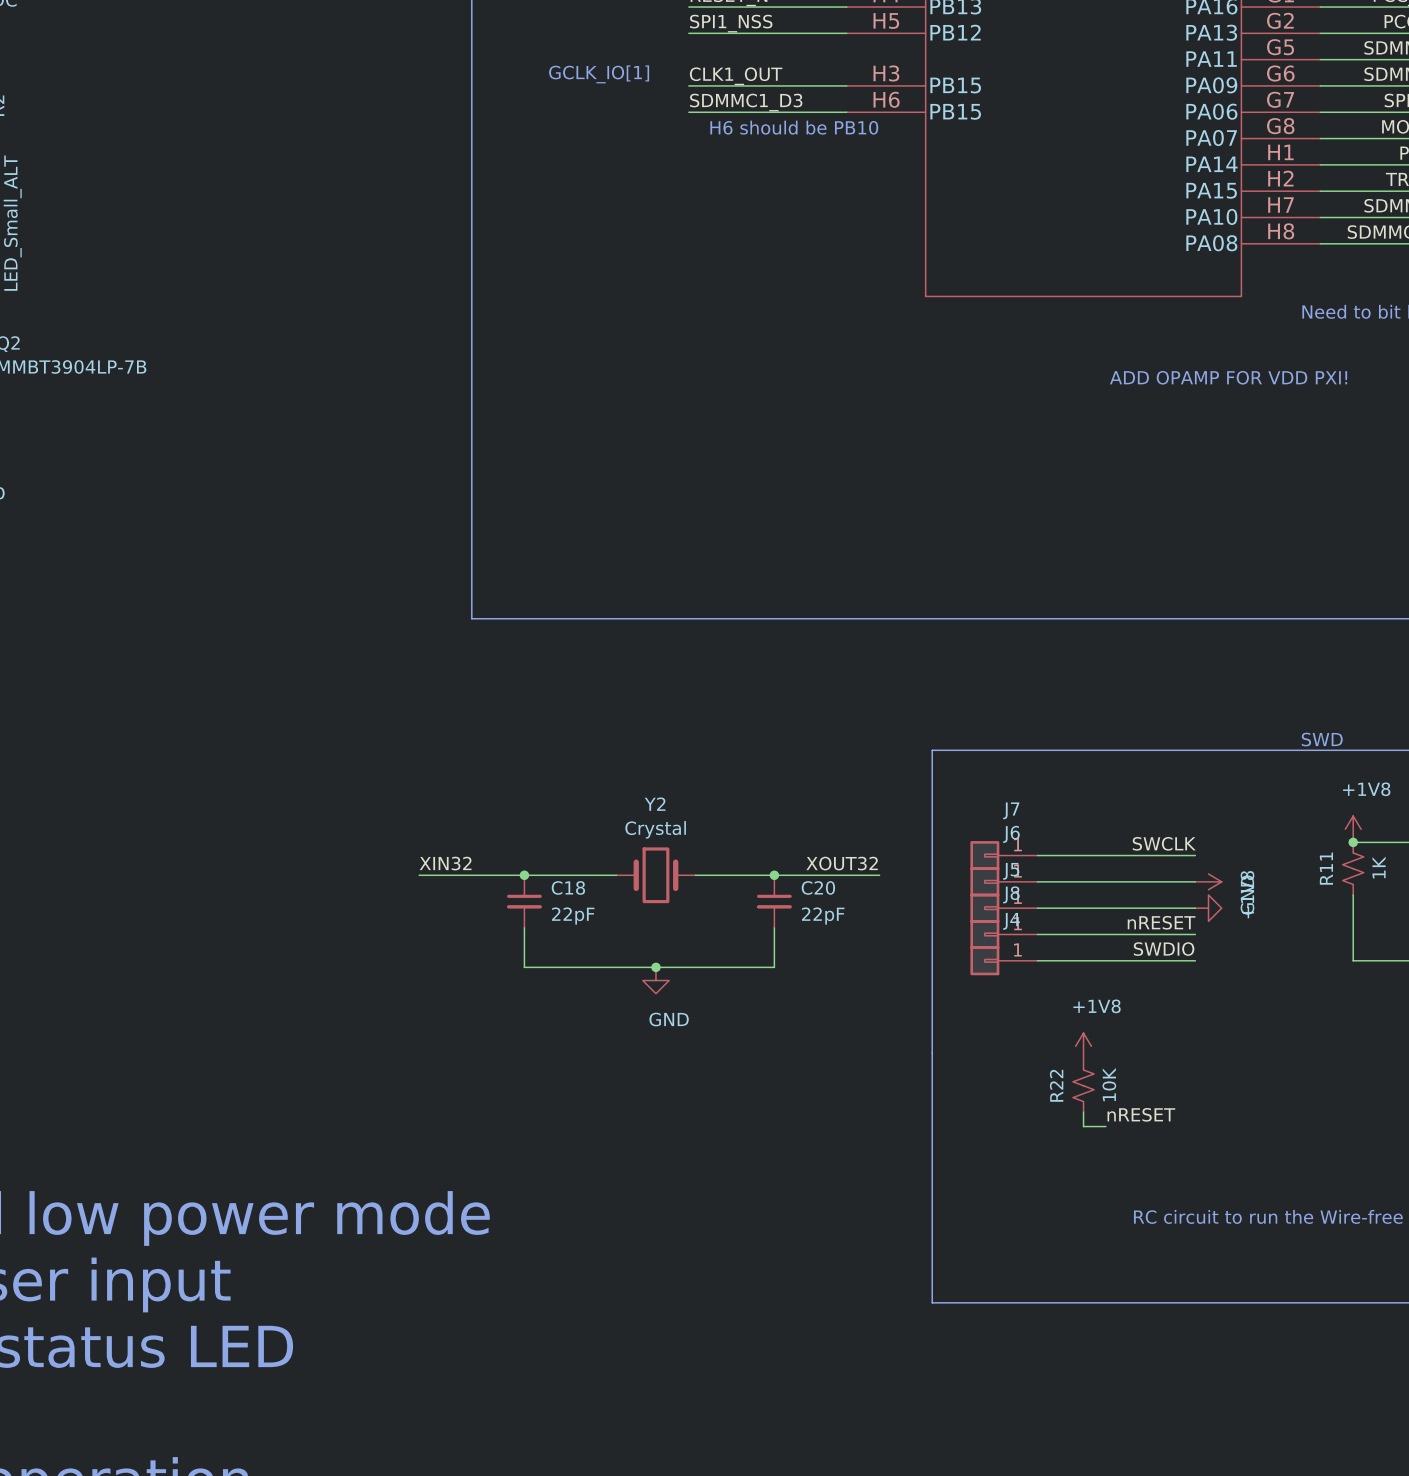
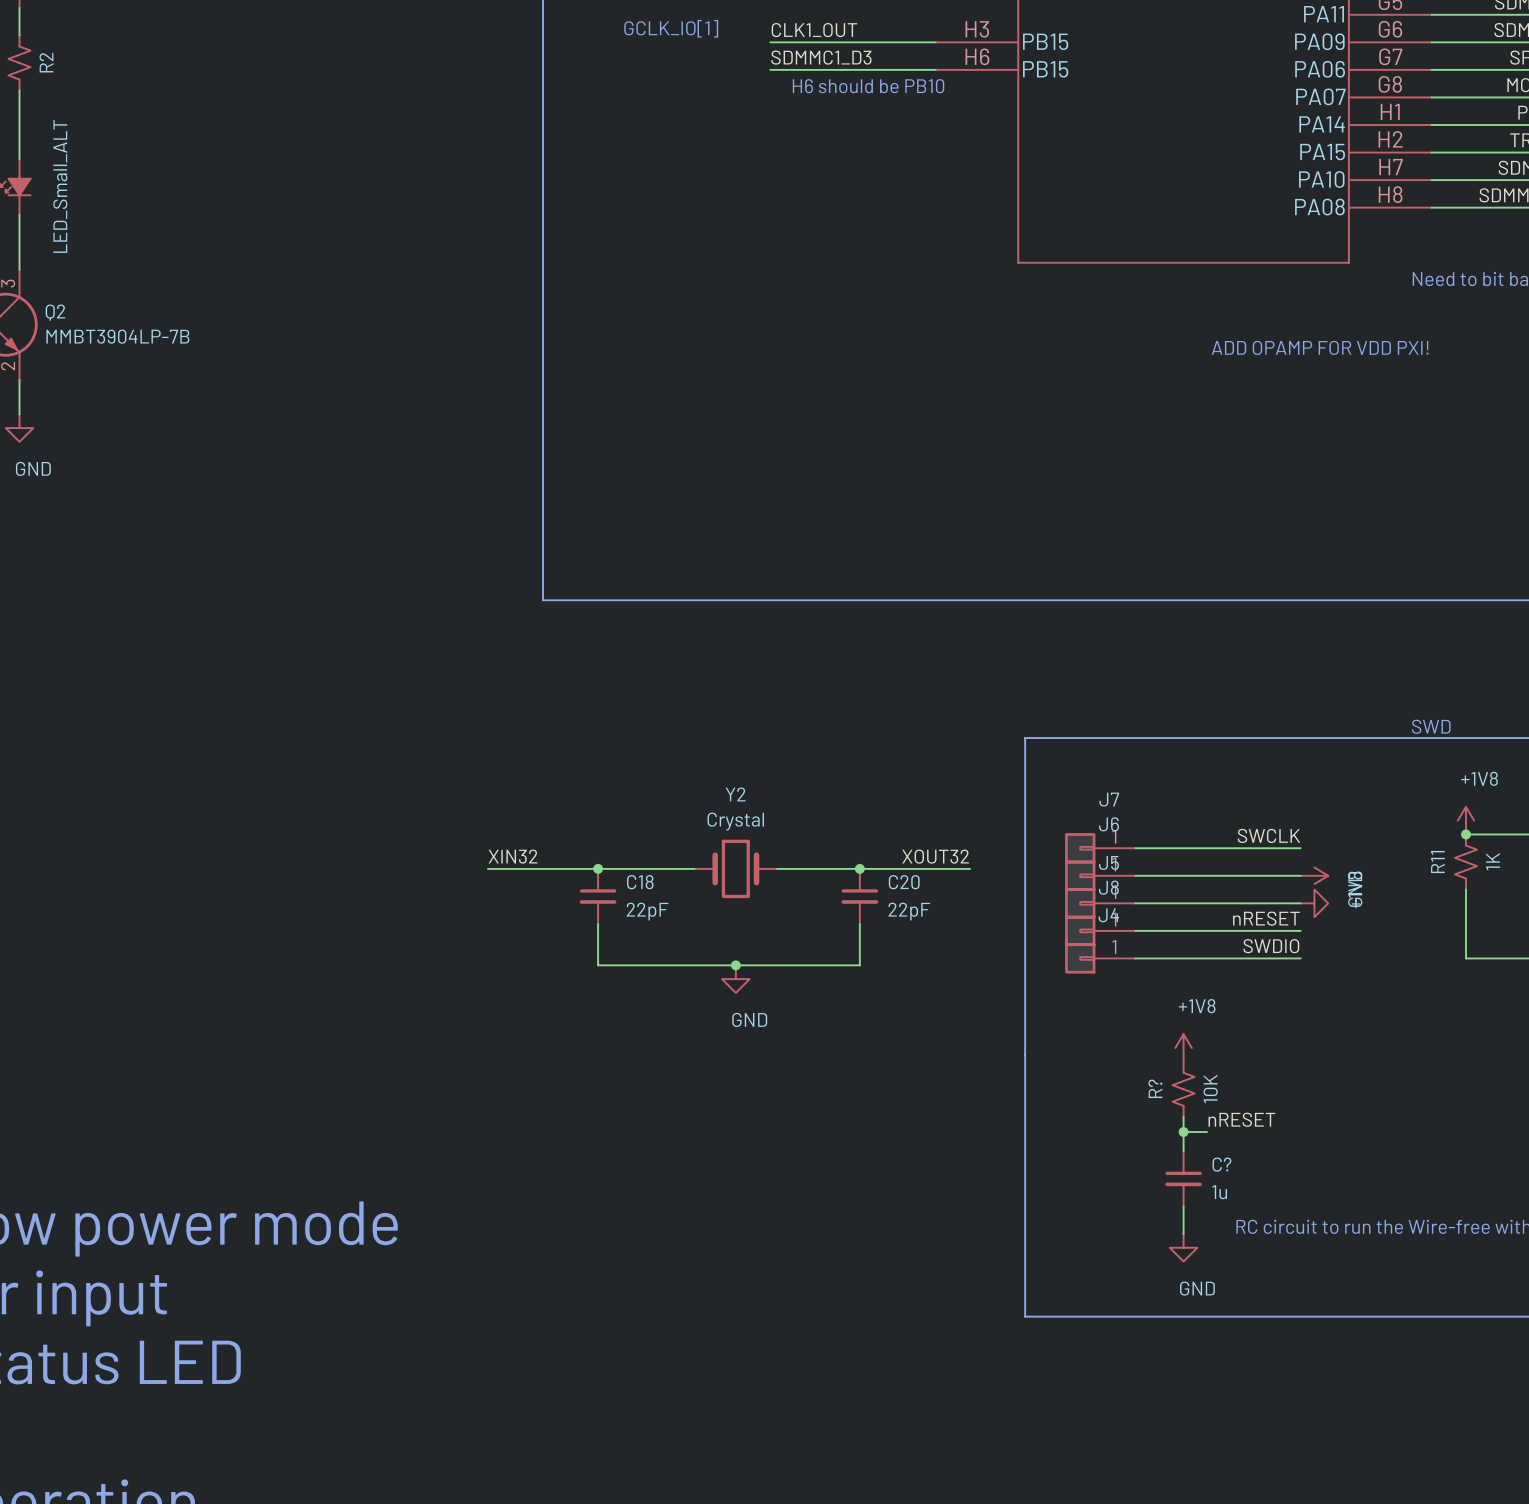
R22 name: R22 (1056, 1085) -> R? (1155, 1088)
wire: none -> (1183, 1132) (1183, 1151)
junction: none -> (1183, 1132)
C?: none -> 1u (1183, 1178)
wire: none -> (1183, 1206) (1183, 1233)
power symbol: none -> GND (1183, 1247)

